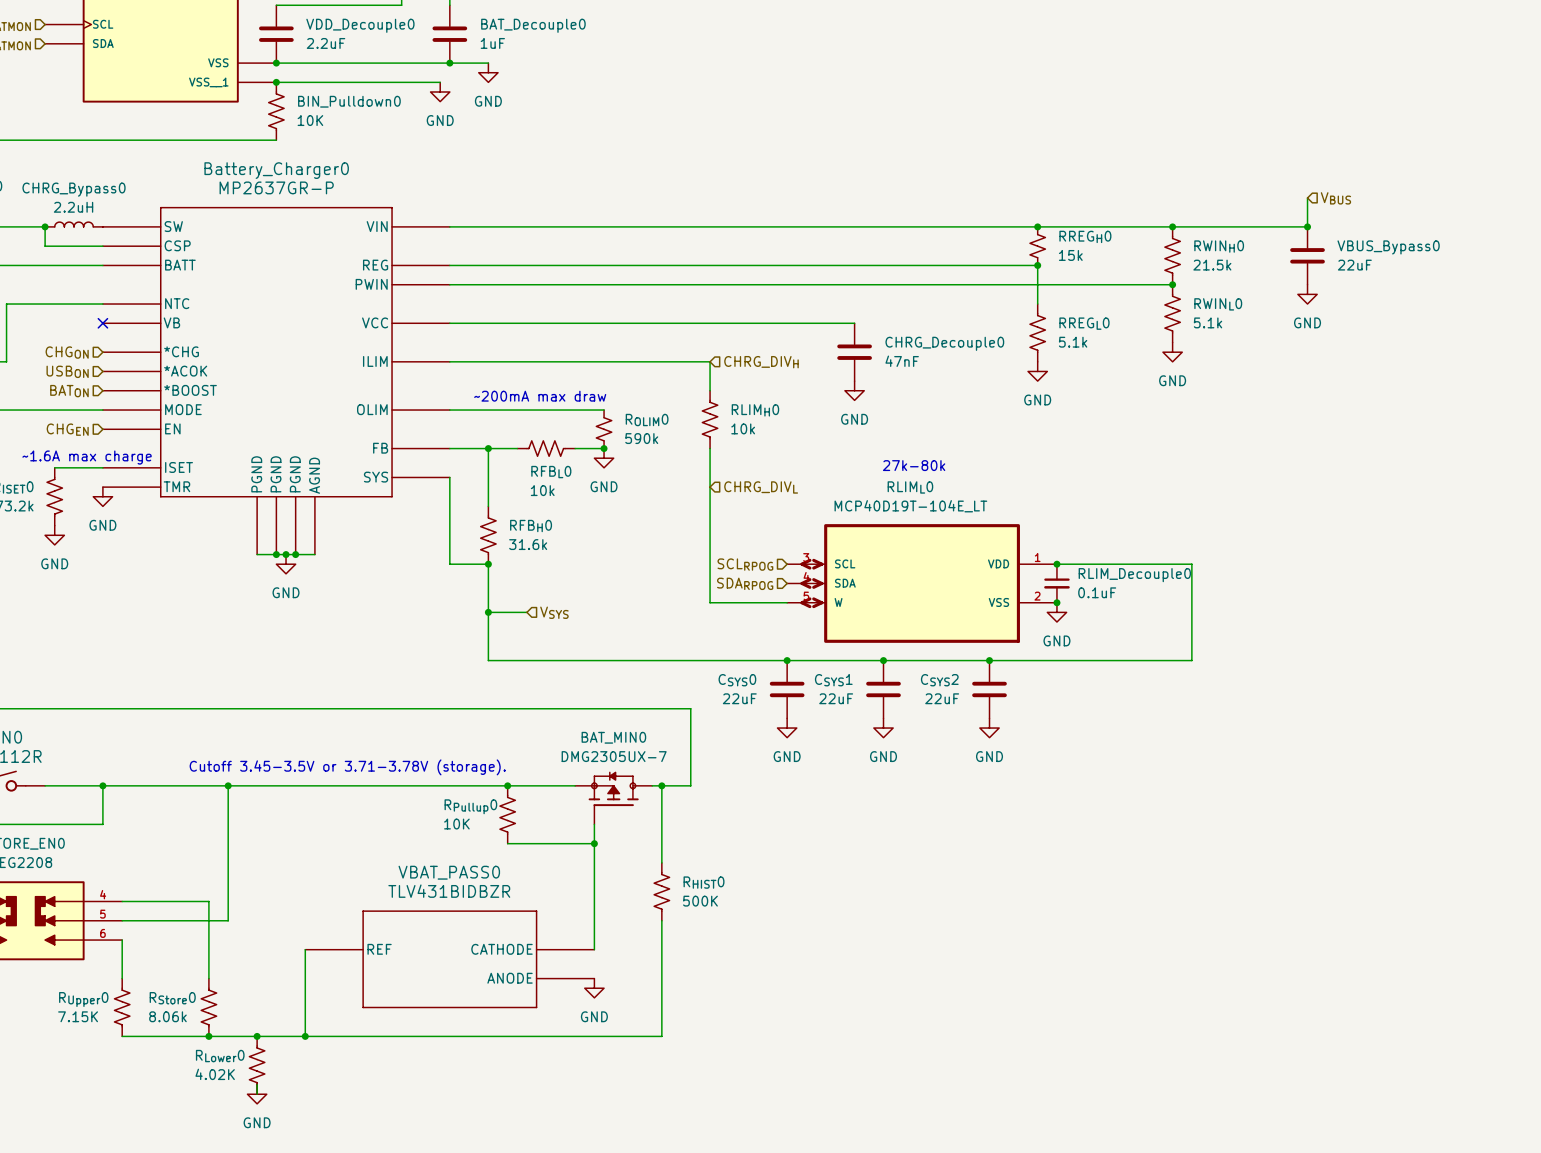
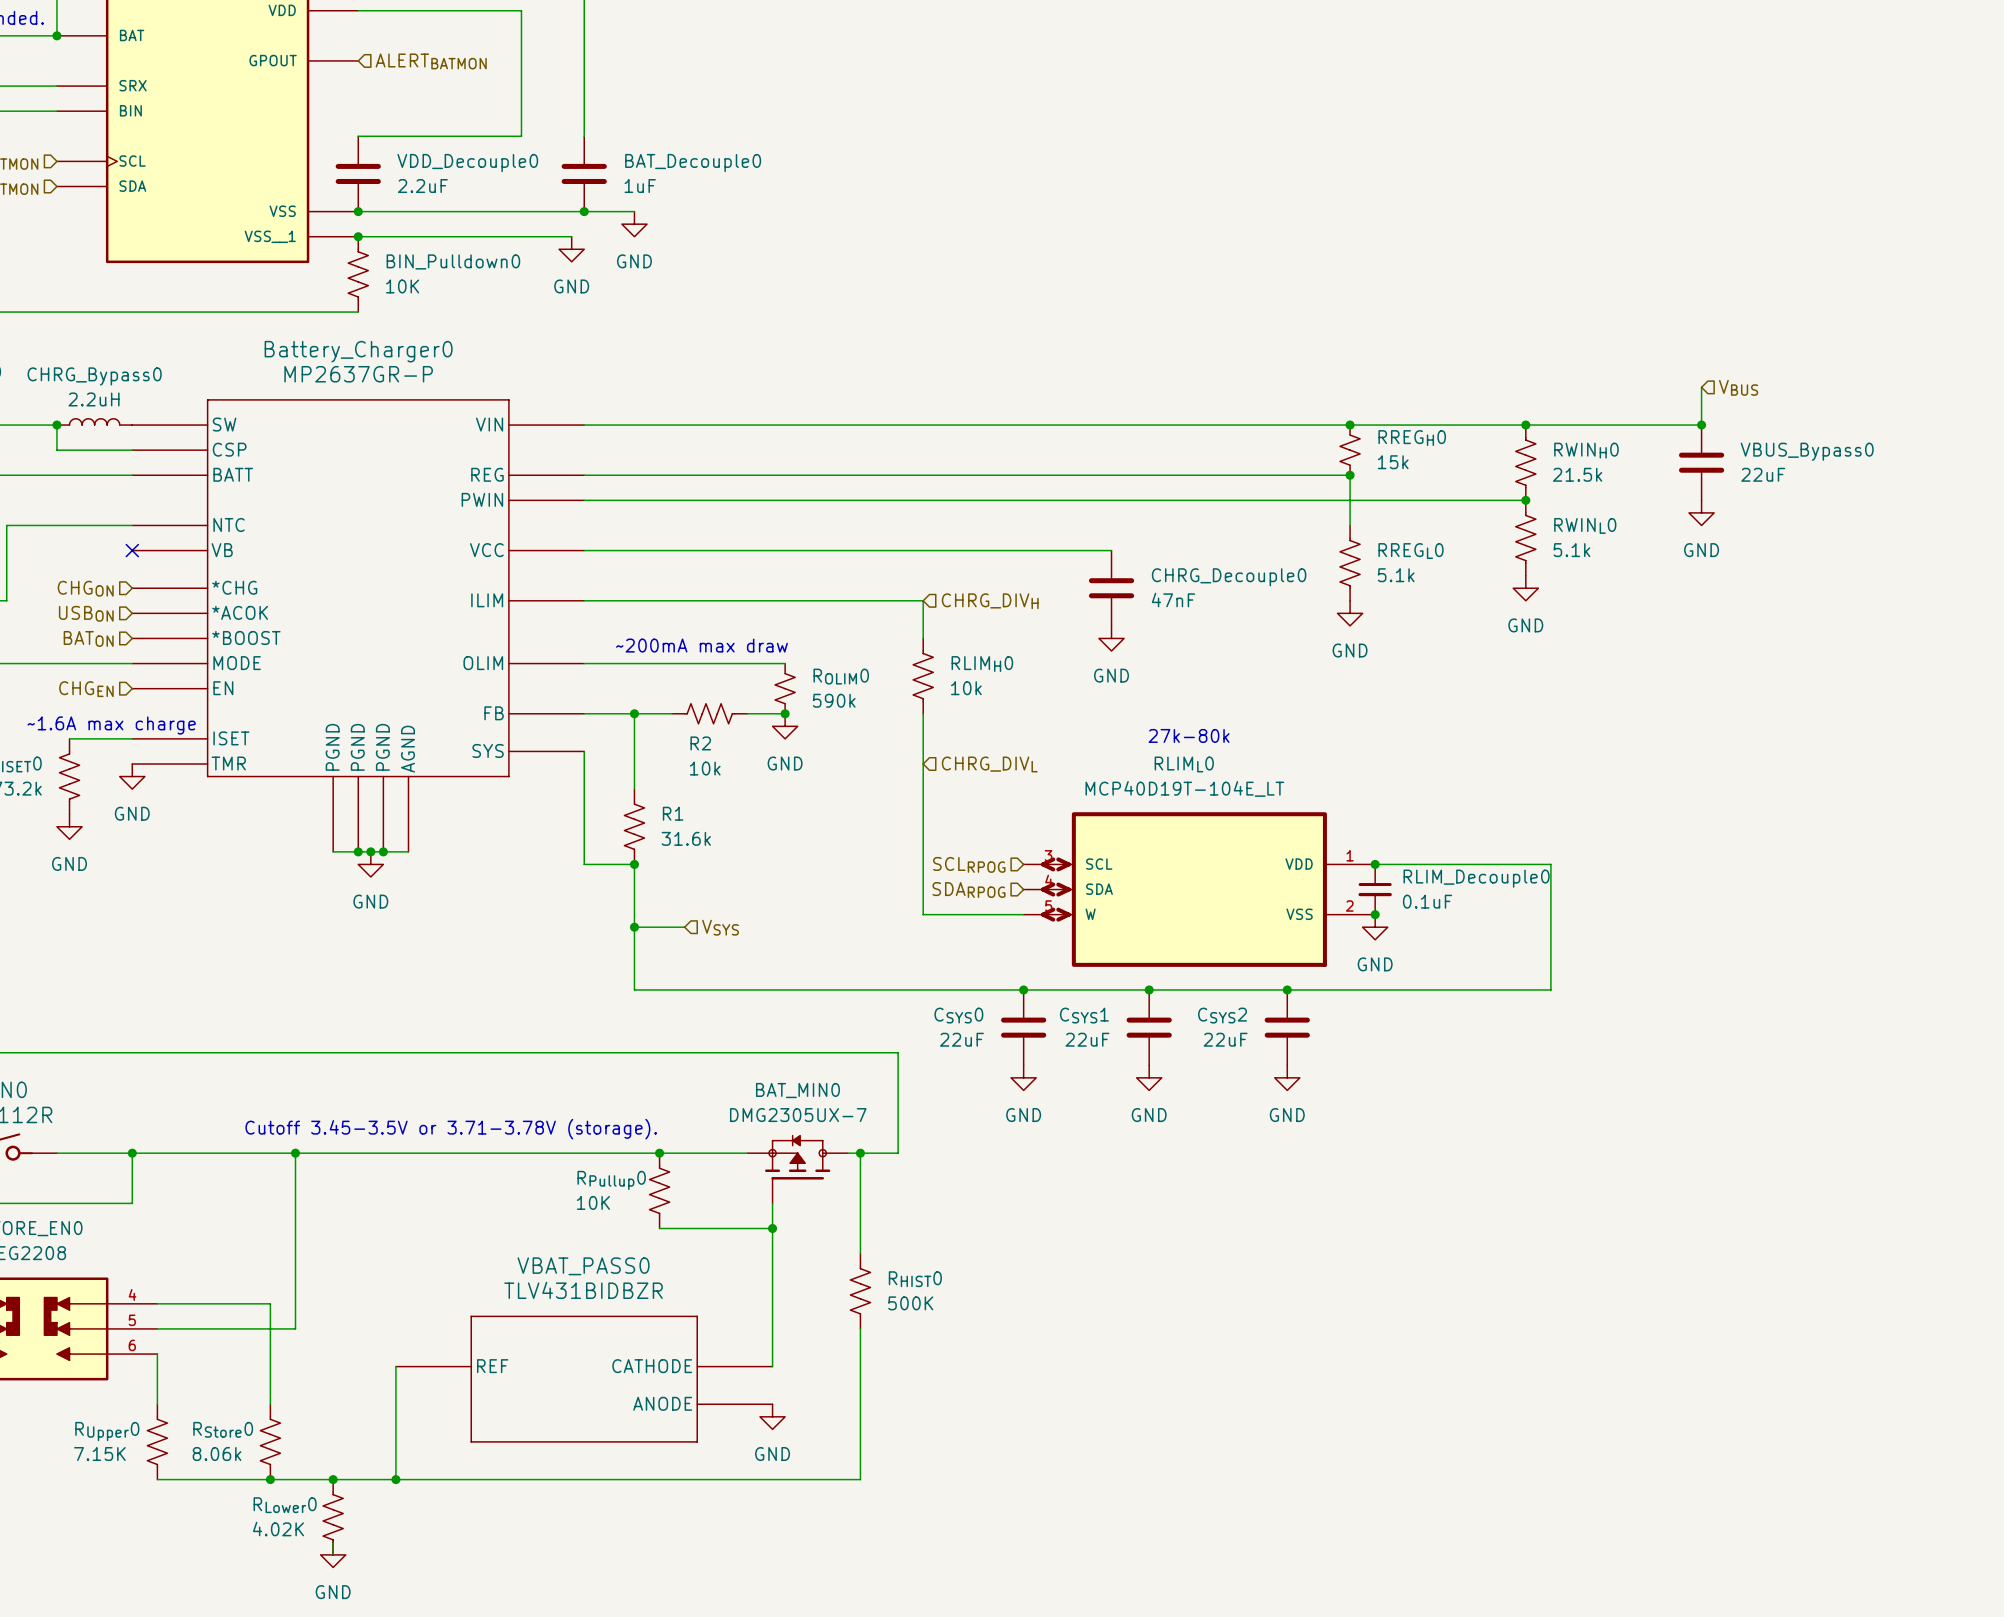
RFBL0 name: RFBL0 (551, 472) -> R2 (700, 743)
RFBH0 name: RFBH0 (531, 526) -> R1 (673, 813)

